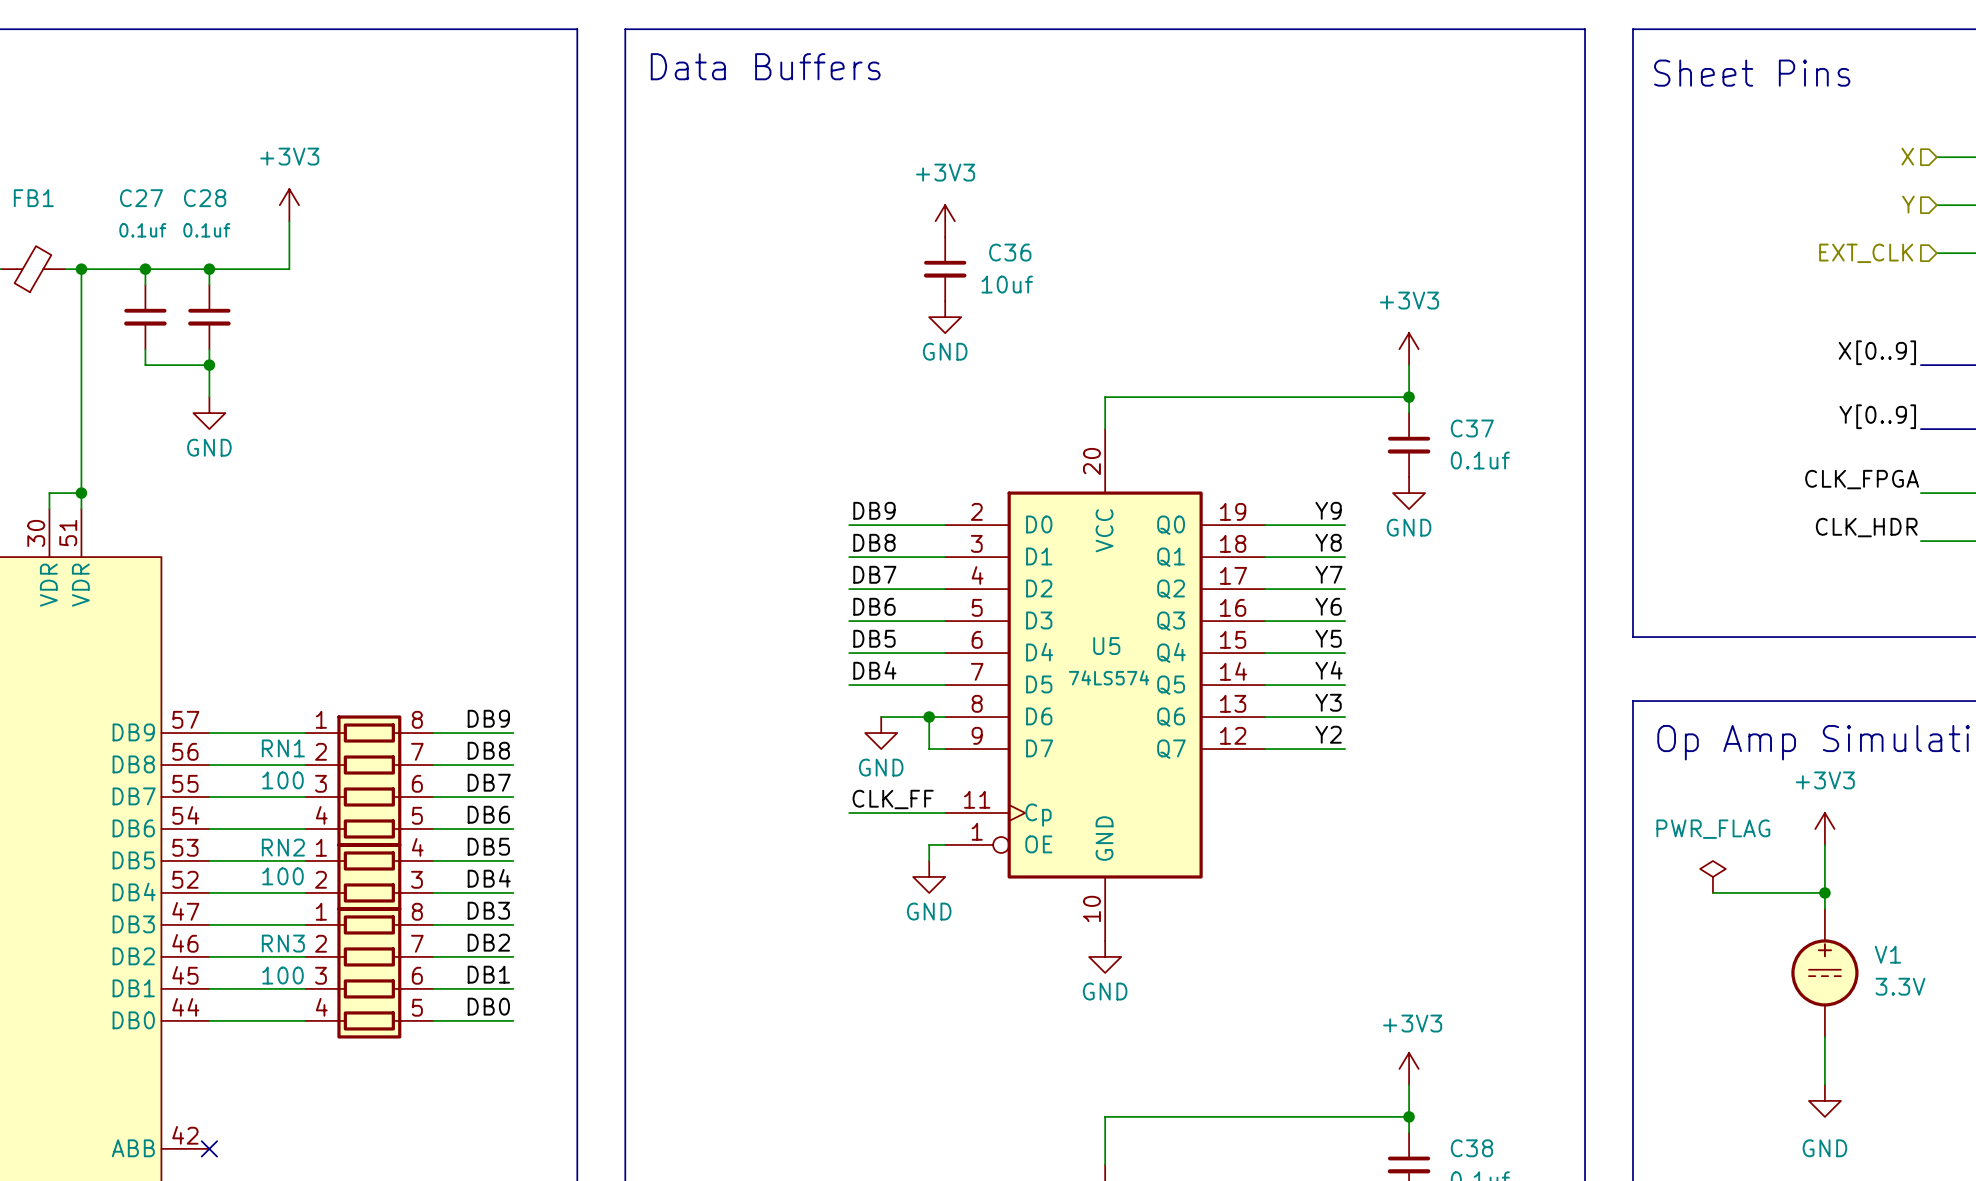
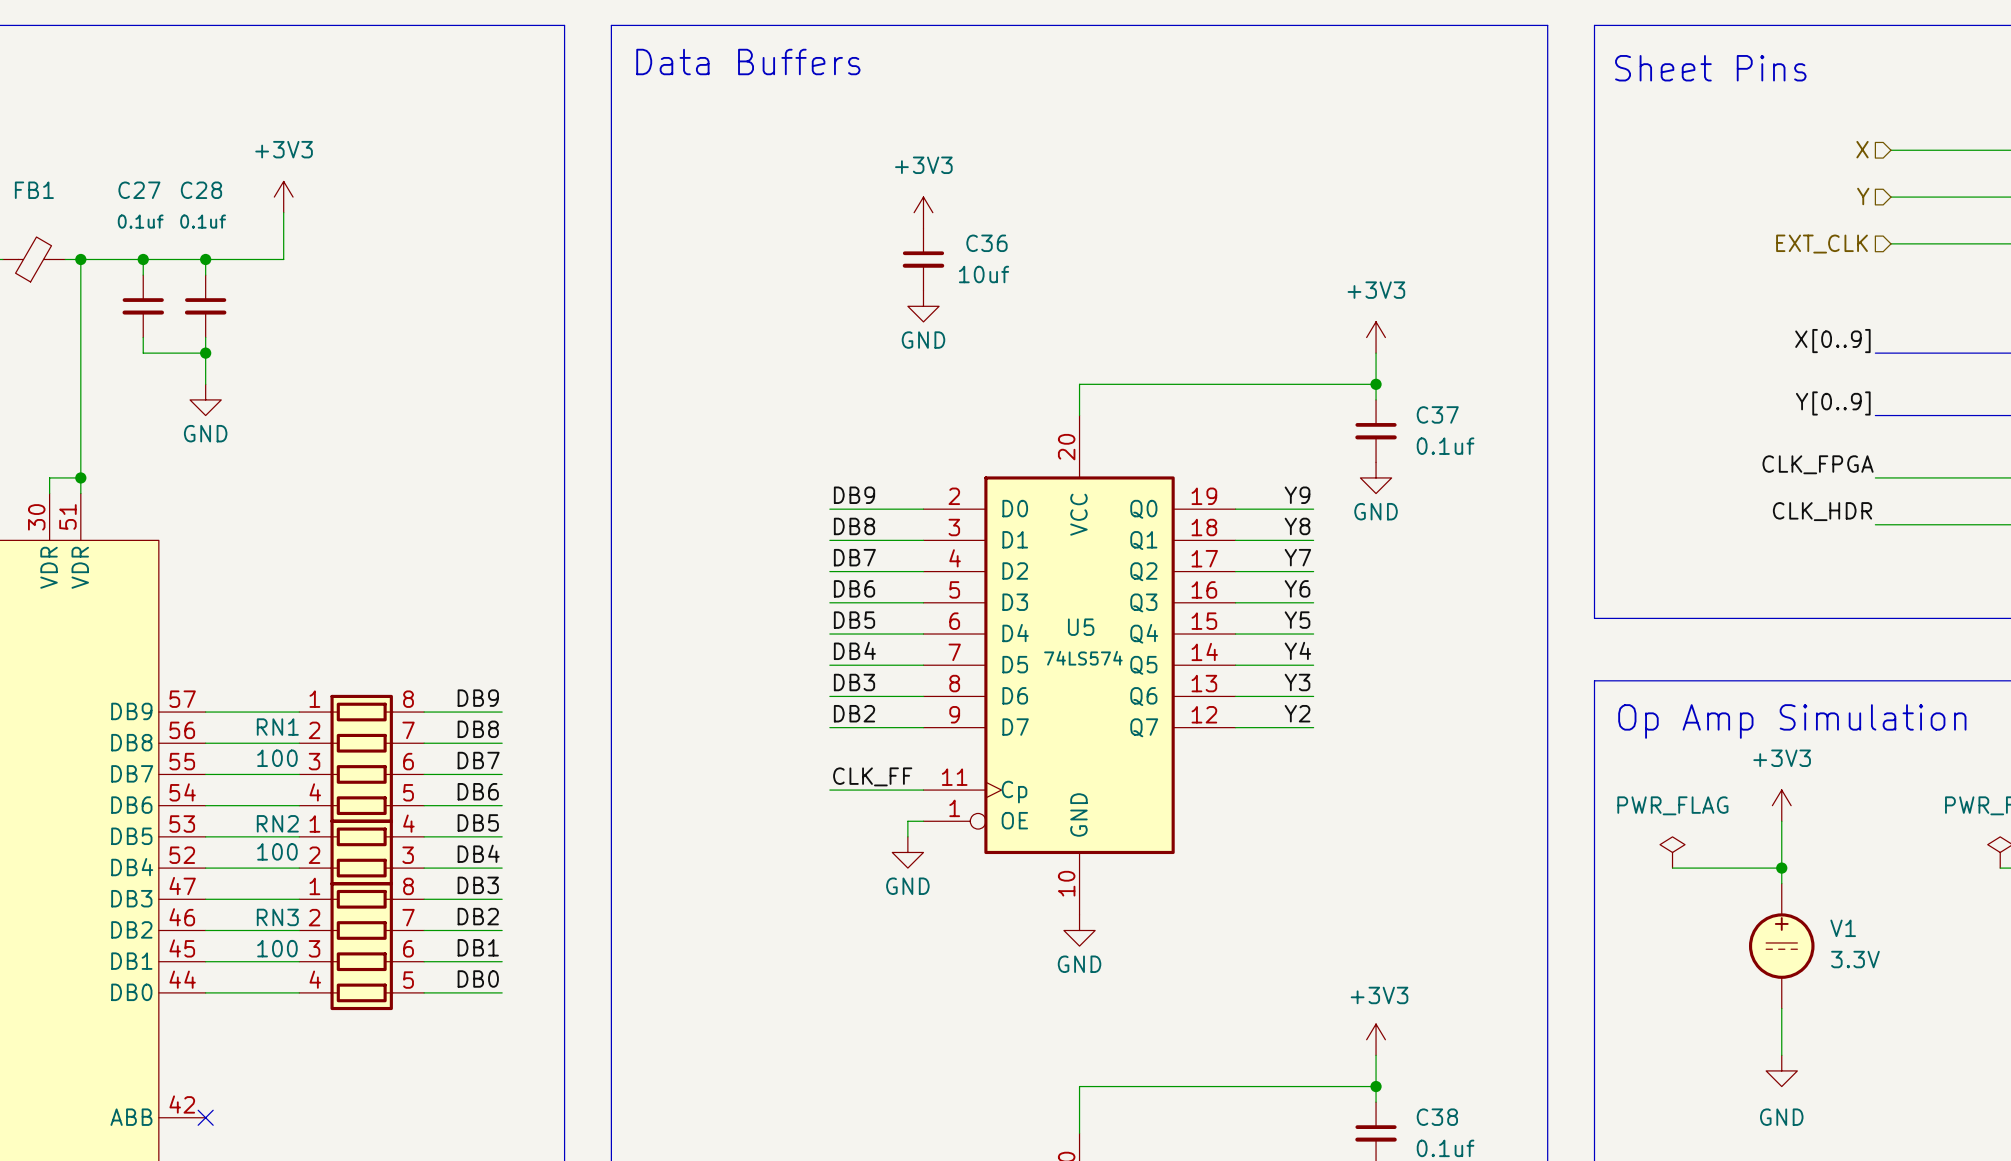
label: none -> DB3 (854, 682)
wire: none -> (829, 696) (861, 696)
wire: (929, 717) (929, 749) -> (829, 727) (907, 727)
junction: (929, 717) -> none
power symbol: GND (881, 733) -> none
label: none -> DB2 (854, 713)

